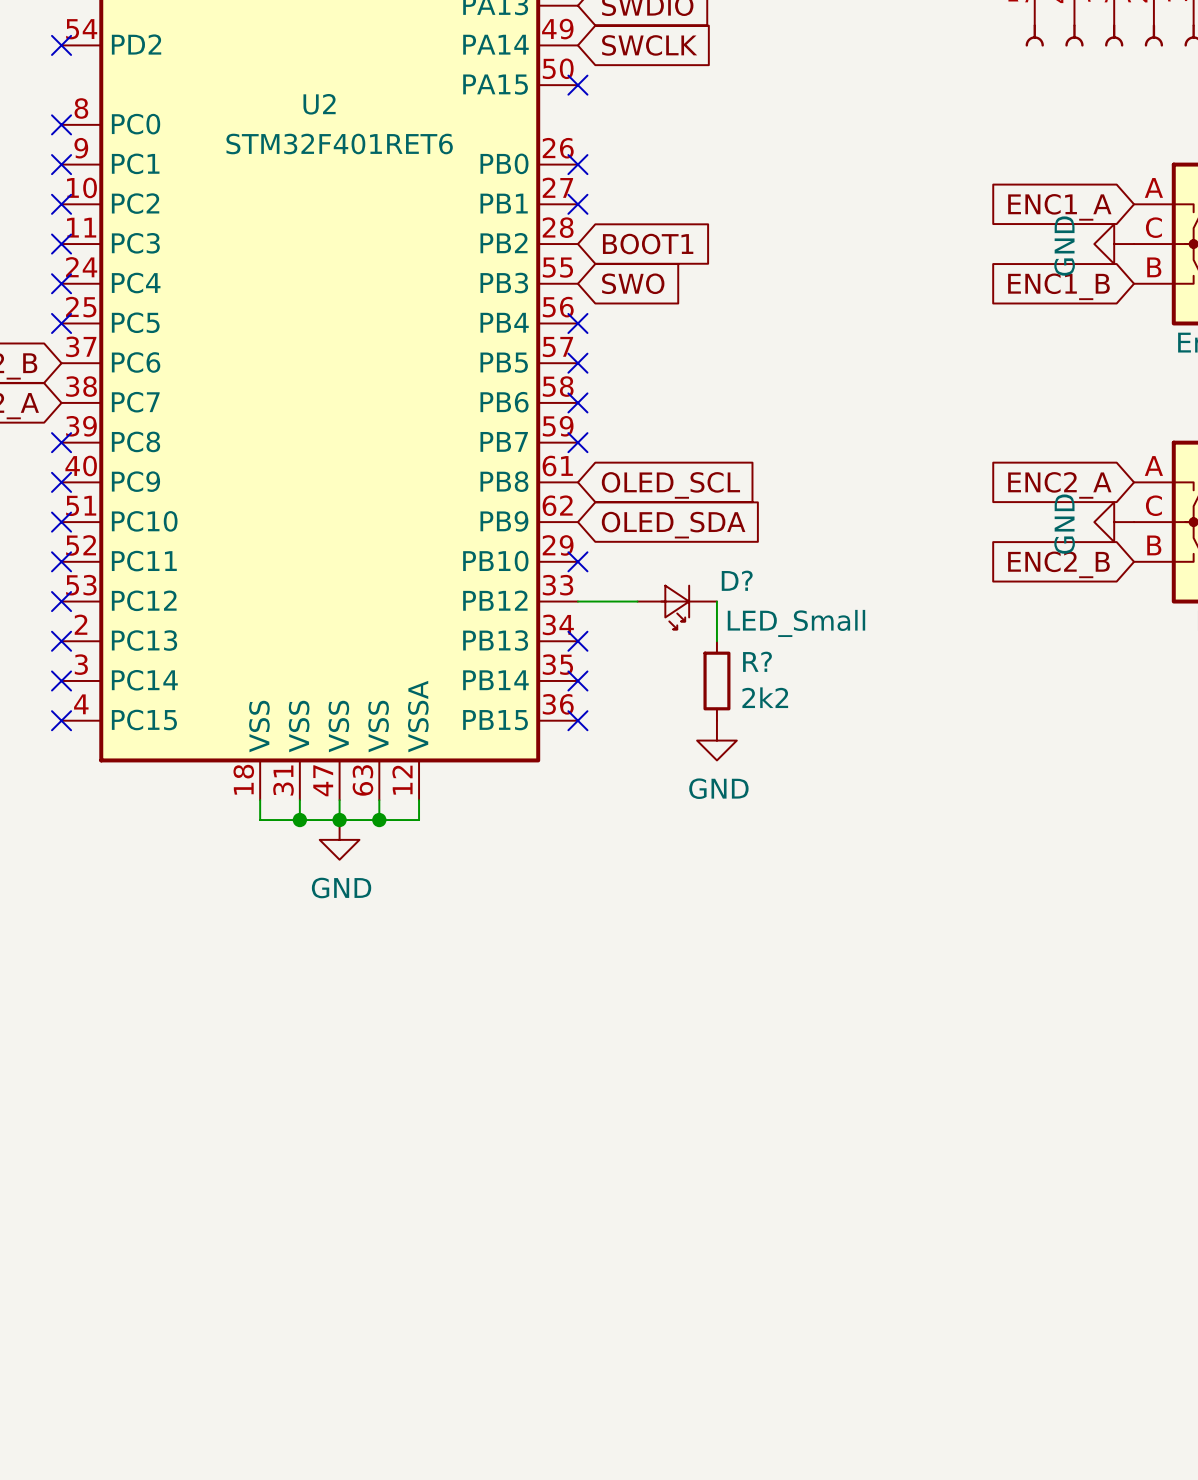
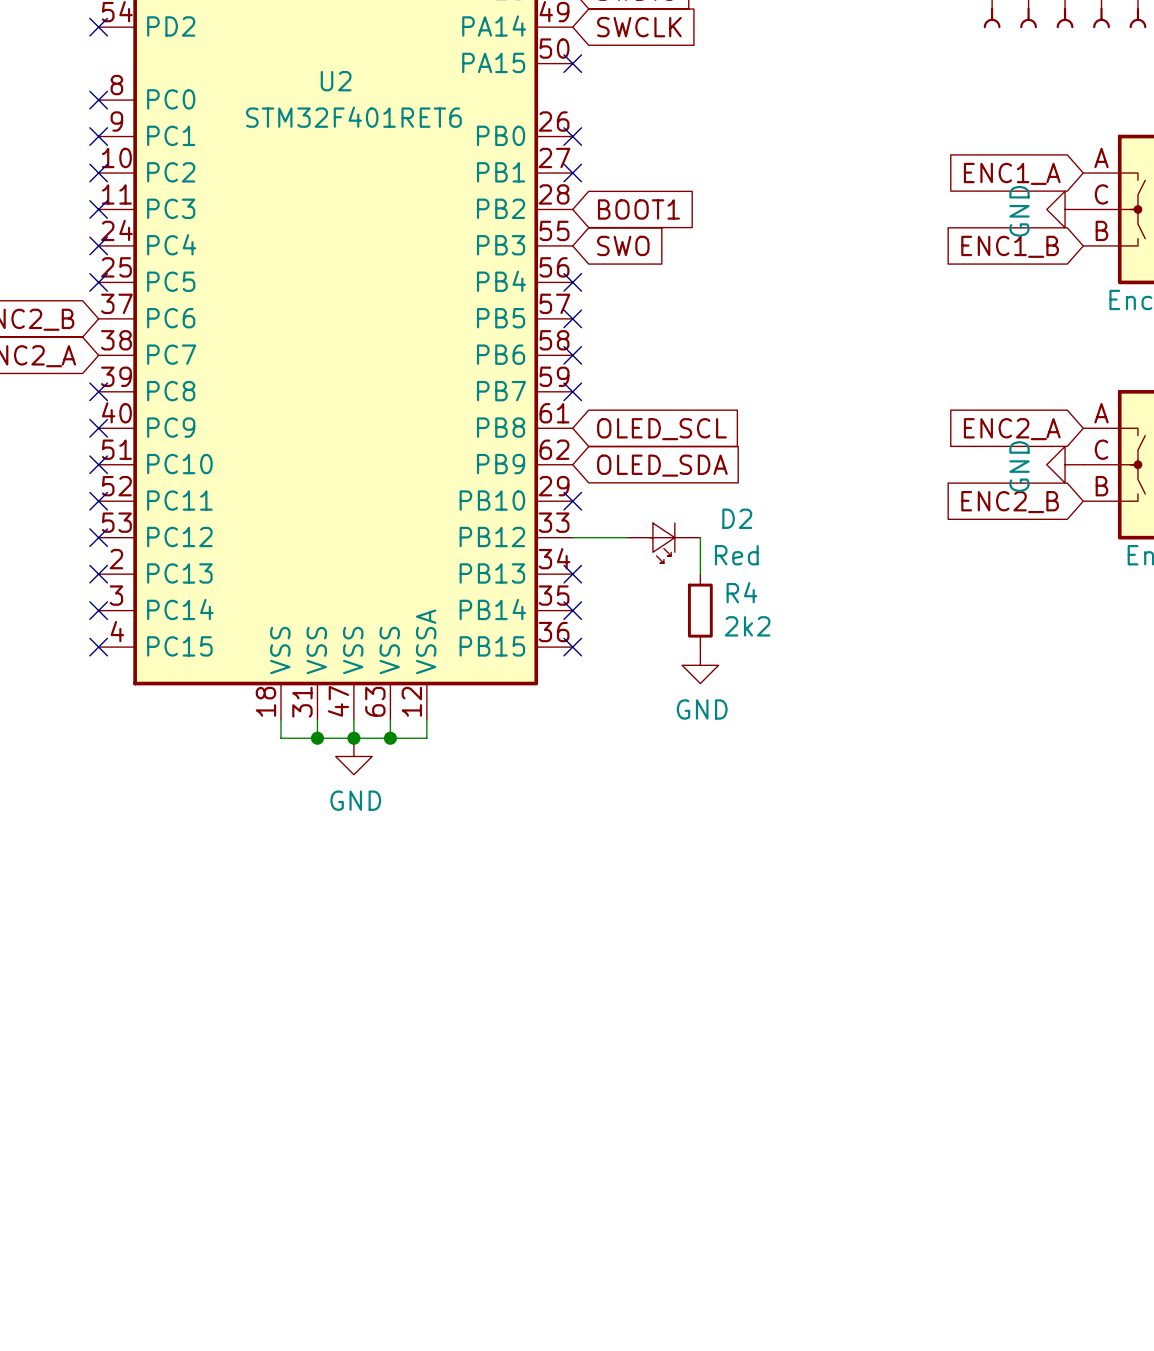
D? name: D? (737, 580) -> D2 (737, 518)
D? value: LED_Small (796, 623) -> Red (736, 555)
R? name: R? (757, 661) -> R4 (741, 592)

